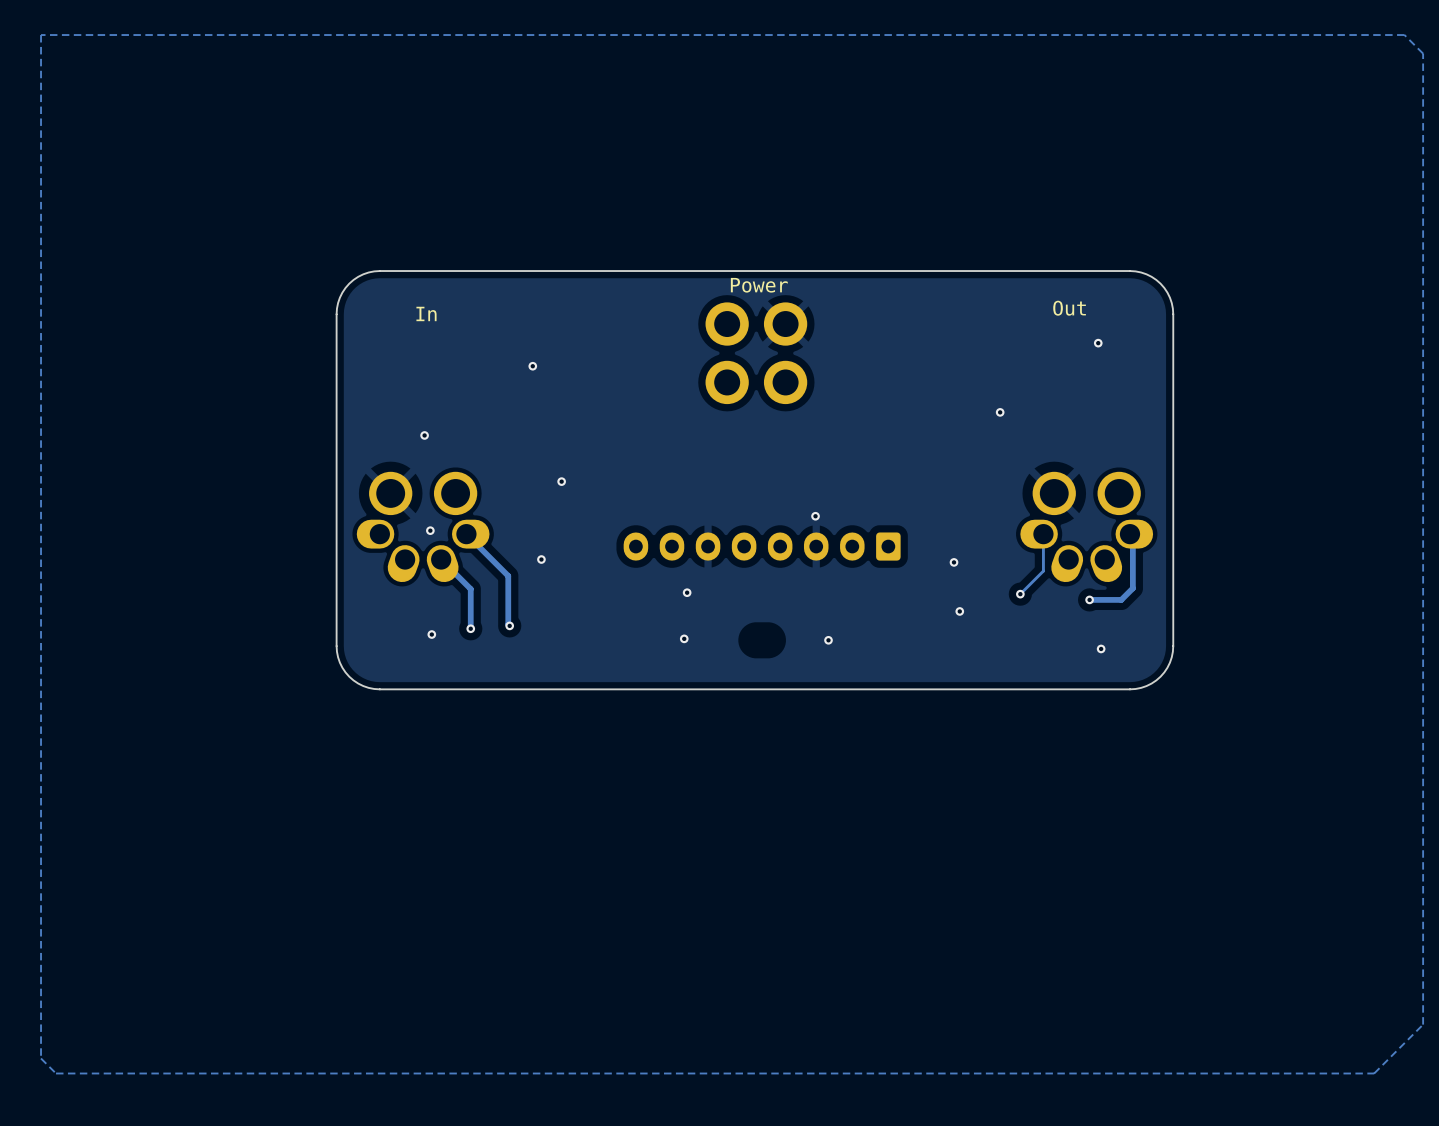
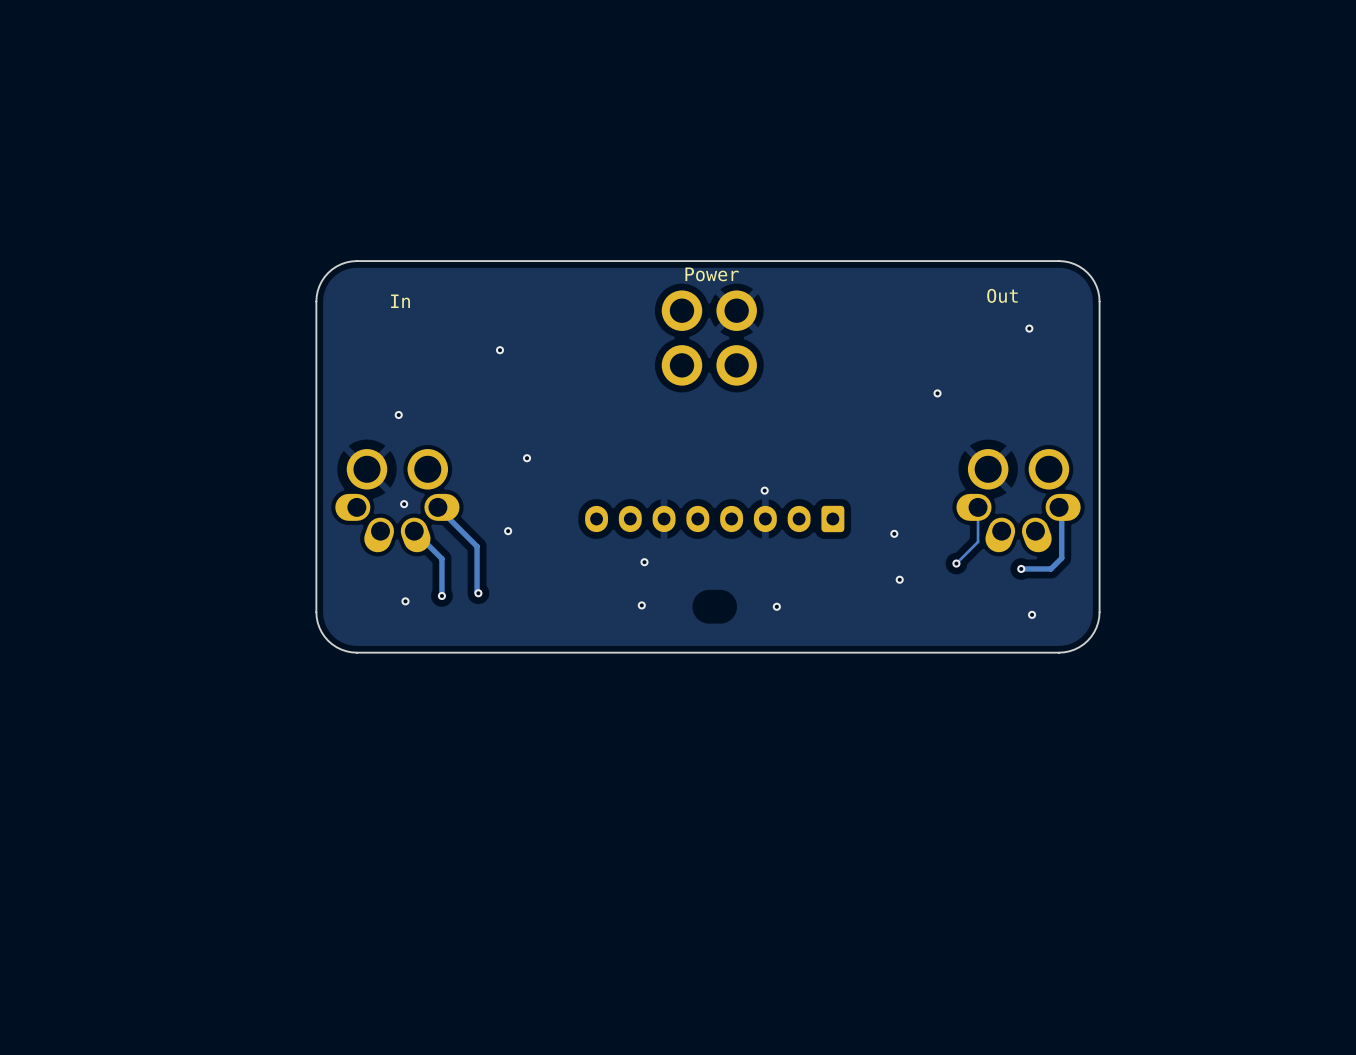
zone outline: (1404, 35) (1423, 53) (1423, 1024) (1374, 1073) (56, 1073) (41, 1058) (41, 35) (1404, 35) -> none

